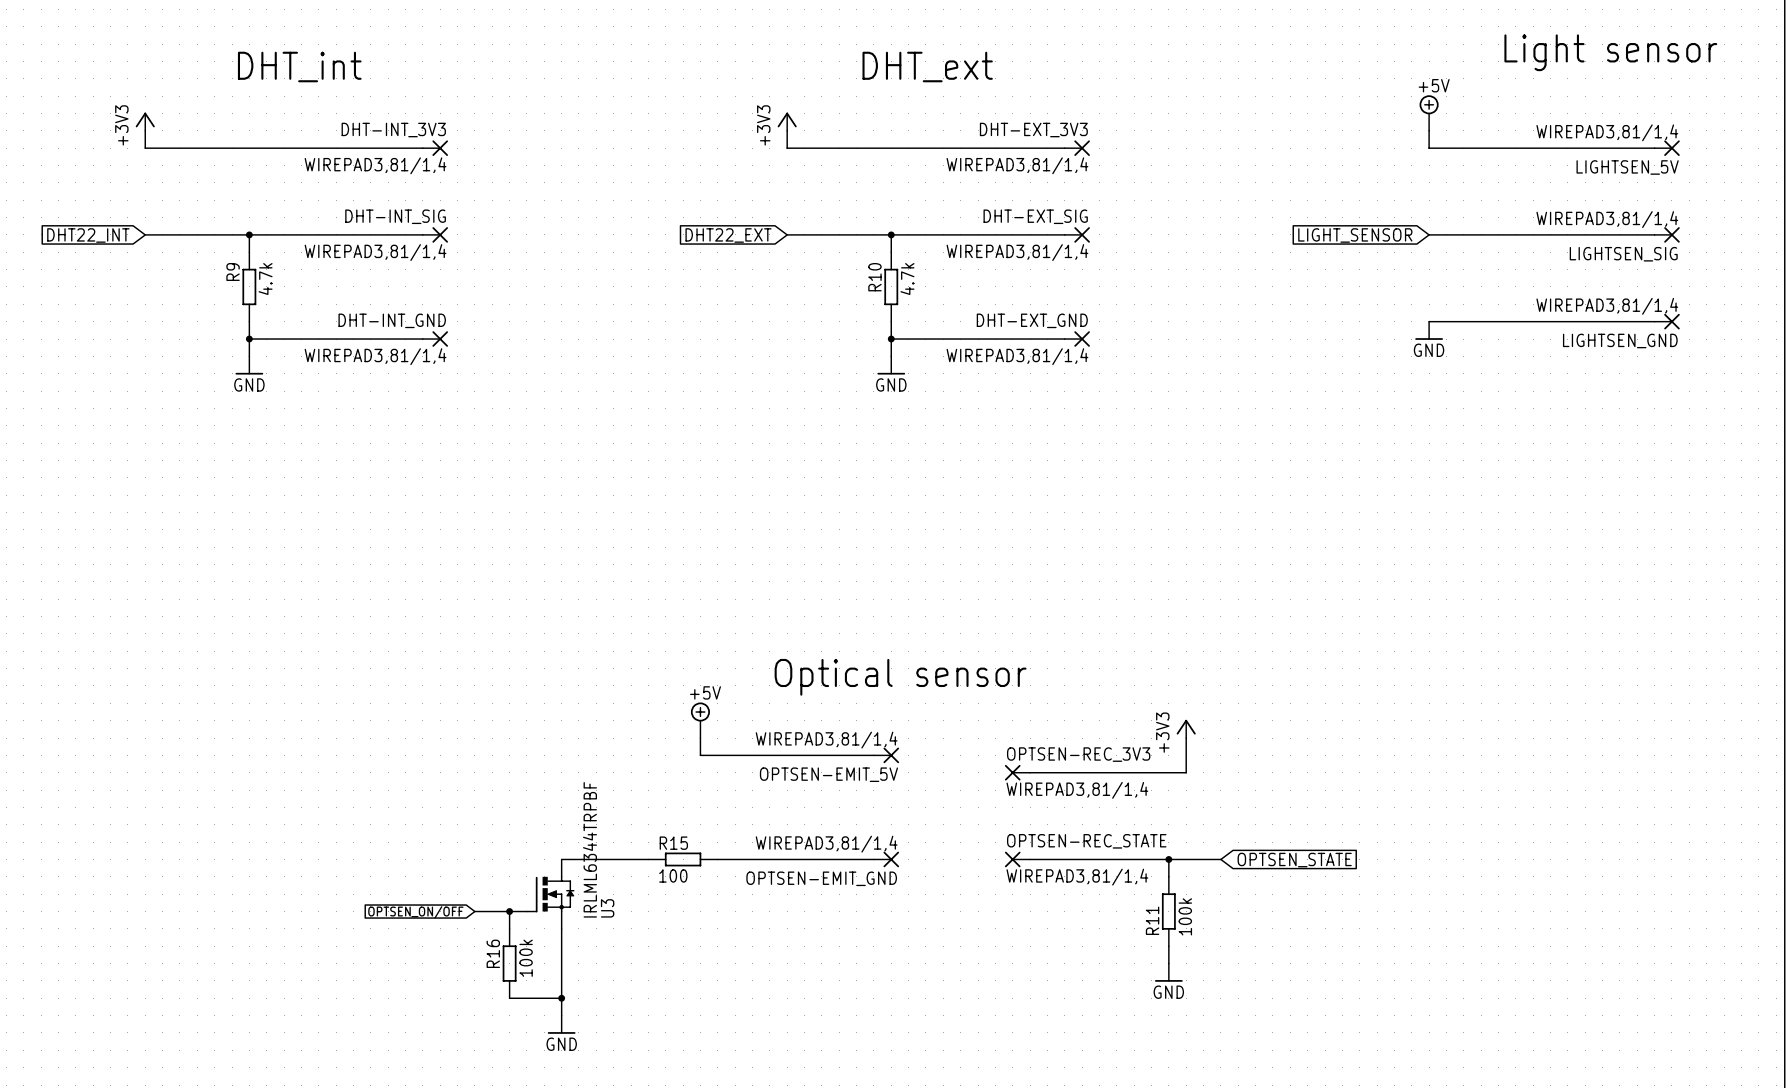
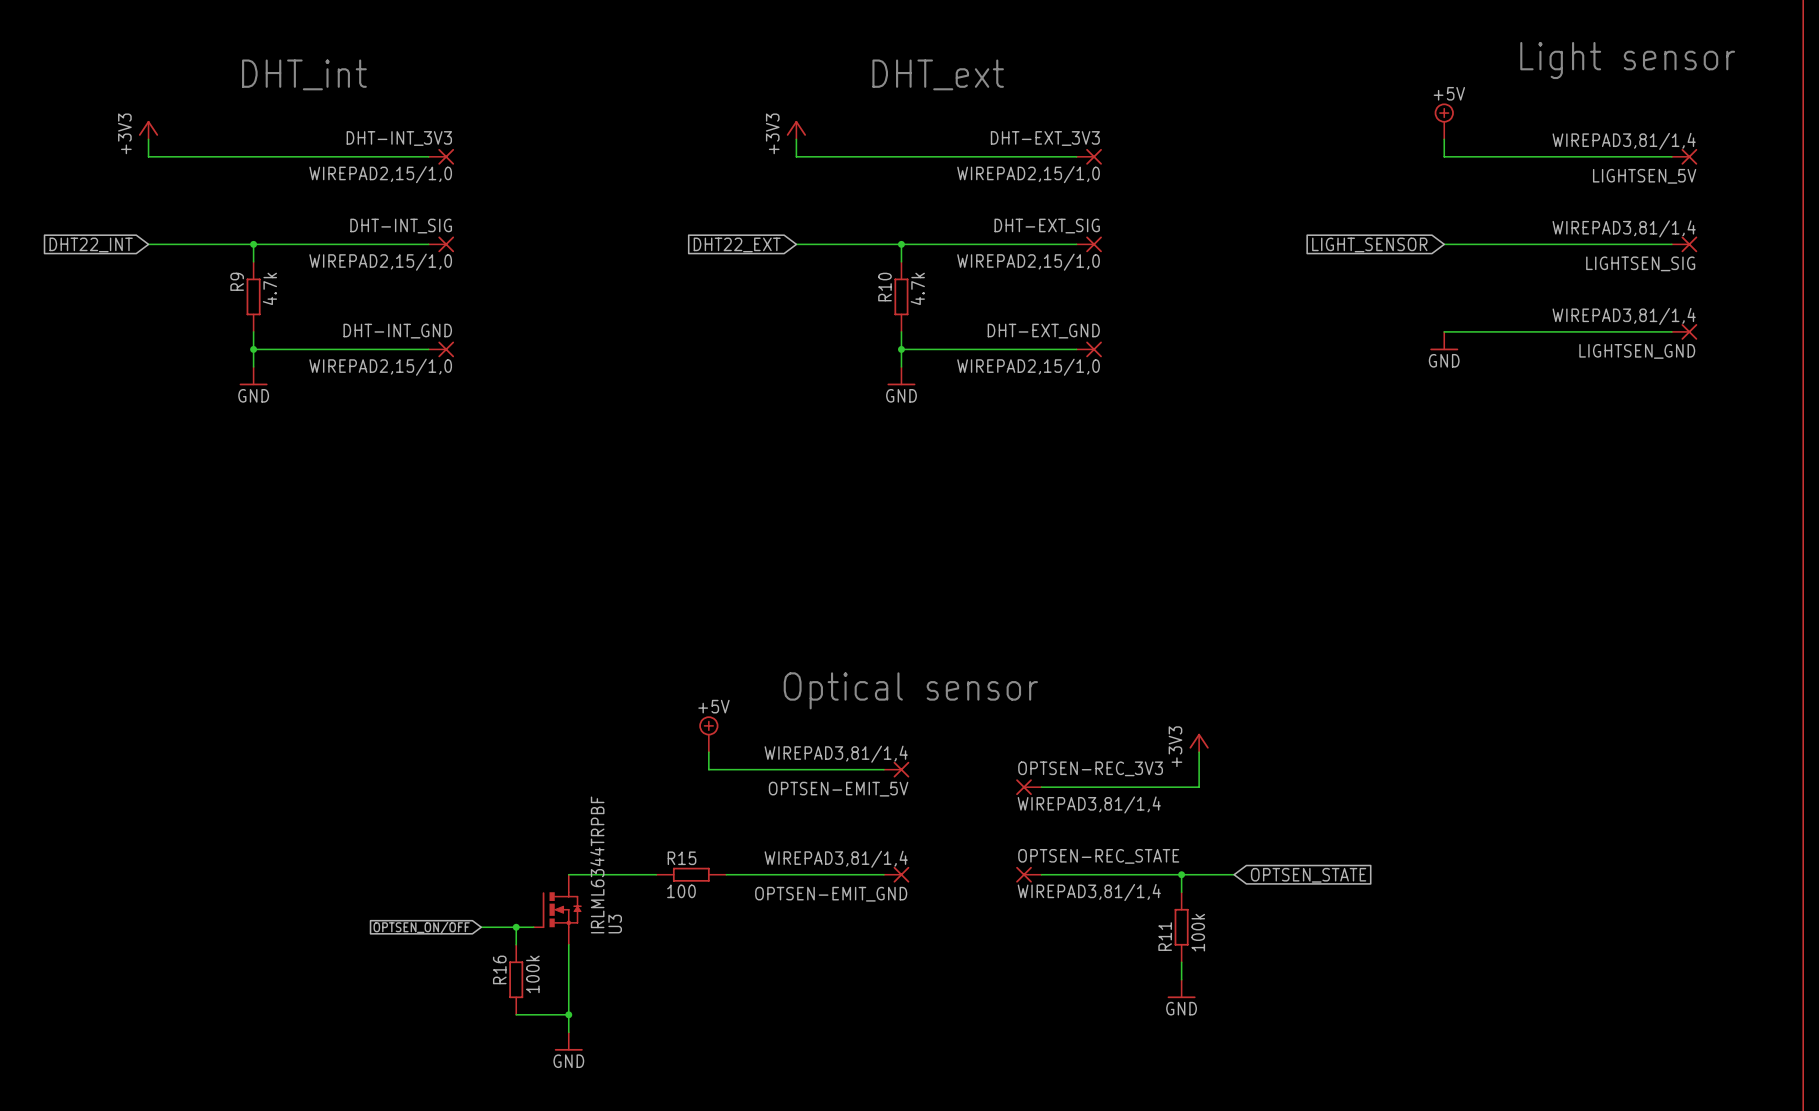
DHT-INT_3V3 value: WIREPAD3,81/1,4 (375, 165) -> WIREPAD2,15/1,0 (380, 174)
DHT-EXT_3V3 value: WIREPAD3,81/1,4 (1017, 165) -> WIREPAD2,15/1,0 (1028, 174)
DHT-INT_SIG value: WIREPAD3,81/1,4 (375, 252) -> WIREPAD2,15/1,0 (380, 262)
DHT-EXT_SIG value: WIREPAD3,81/1,4 (1017, 252) -> WIREPAD2,15/1,0 (1028, 262)
DHT-INT_GND value: WIREPAD3,81/1,4 (375, 356) -> WIREPAD2,15/1,0 (380, 367)
DHT-EXT_GND value: WIREPAD3,81/1,4 (1017, 356) -> WIREPAD2,15/1,0 (1028, 367)

